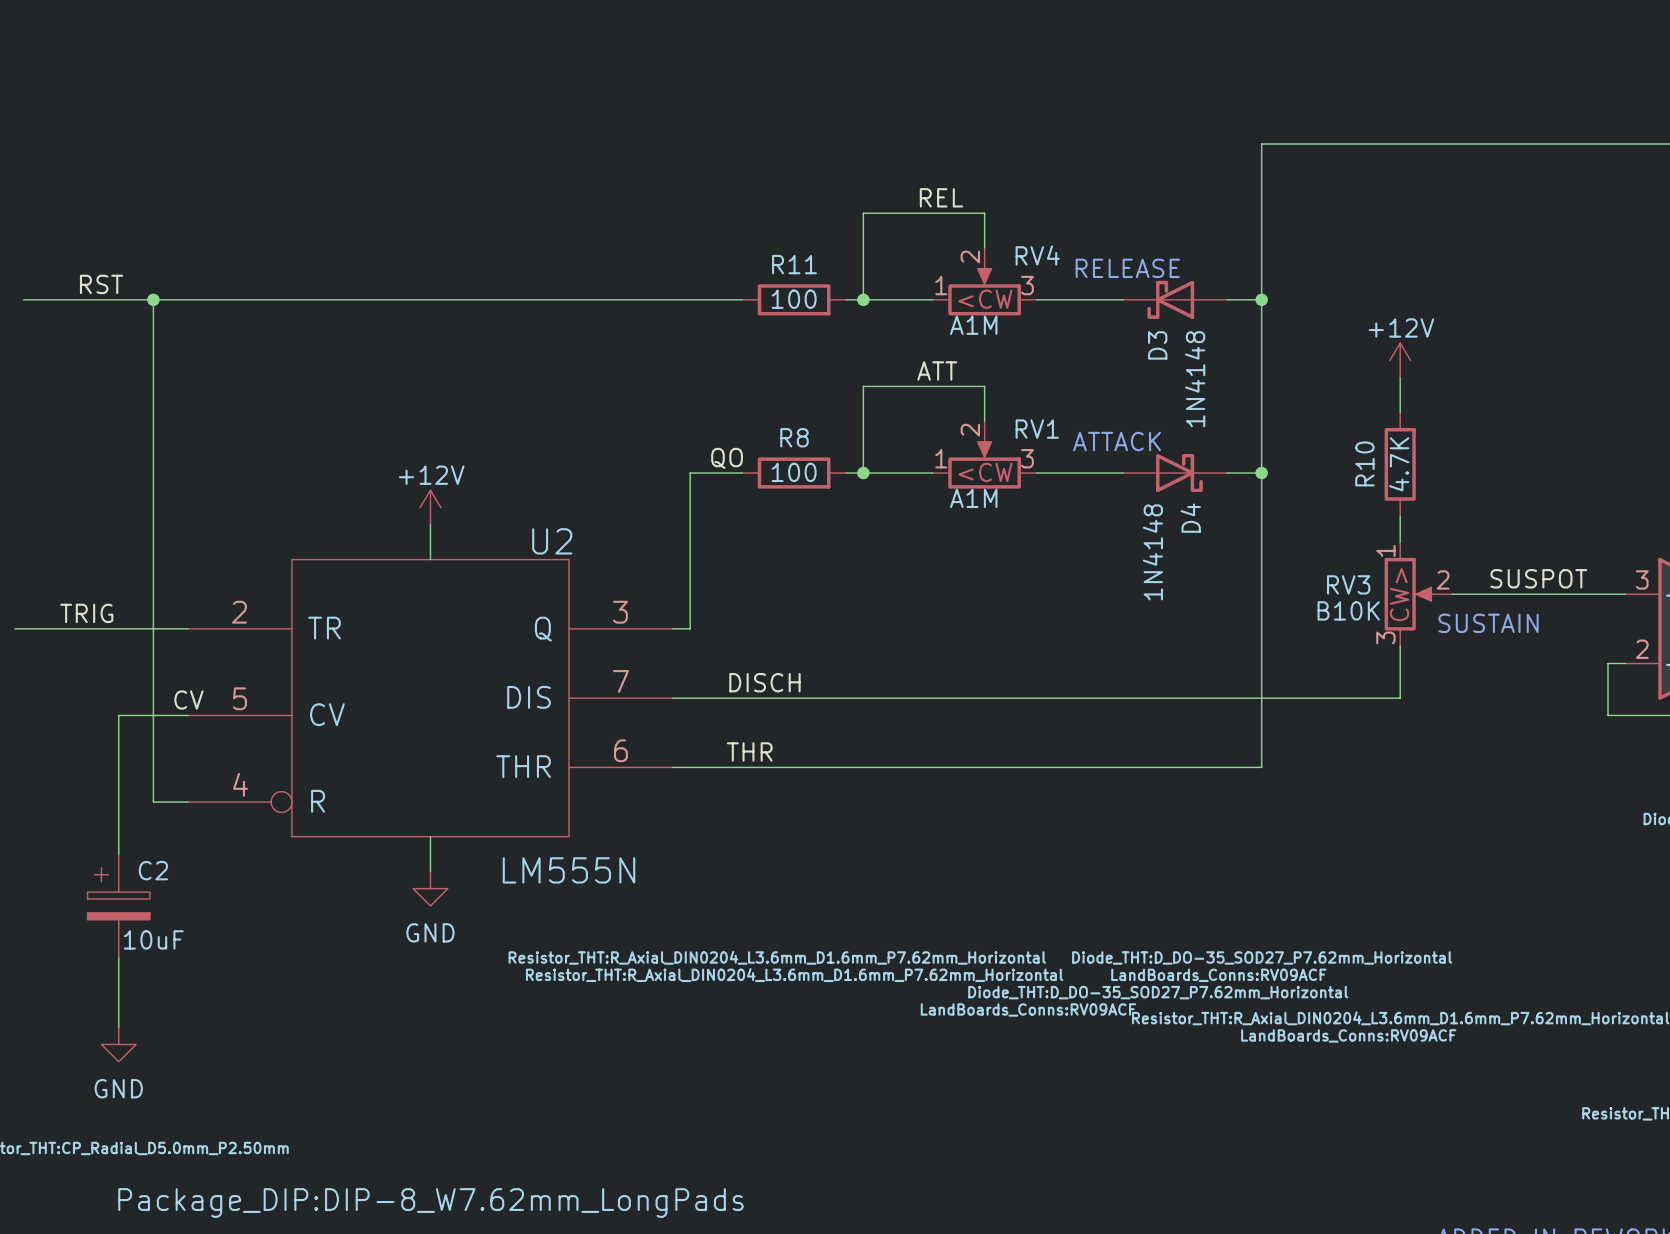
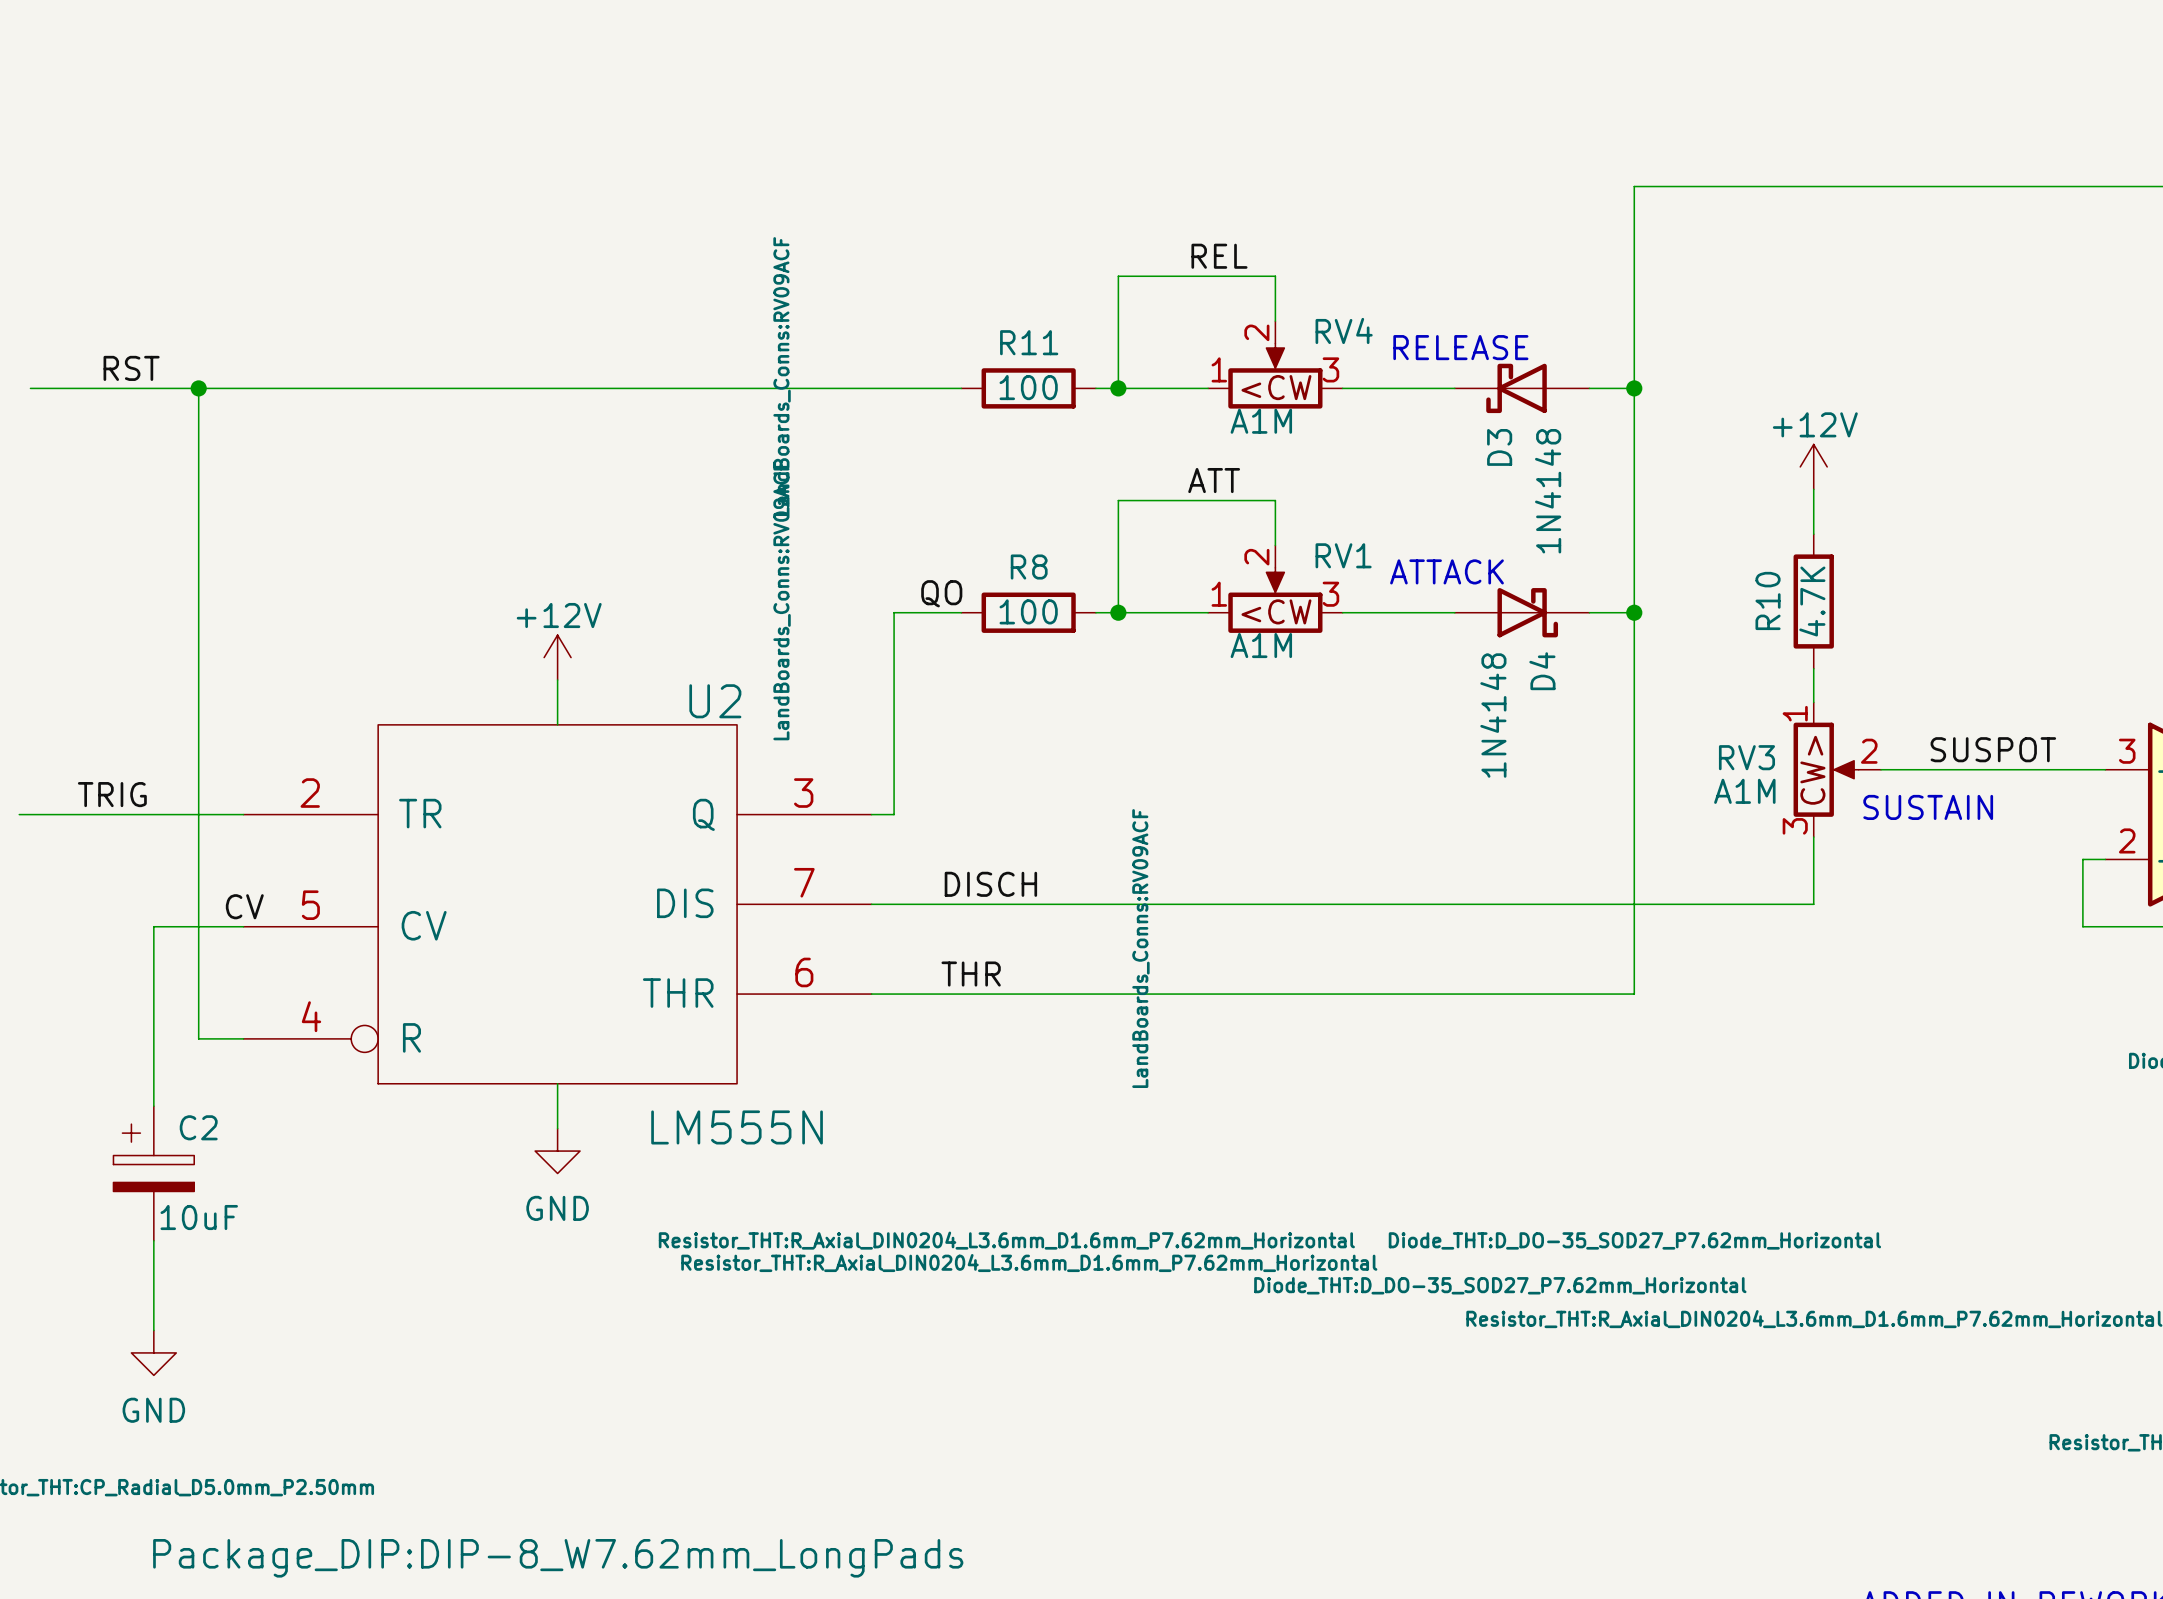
RV3 value: B10K (1348, 610) -> A1M (1744, 791)
RV1 text rotation: 0° (1218, 975) -> 90° counterclockwise (782, 600)
RV1 text position: LandBoards_Conns:RV09ACF (1218, 975) -> LandBoards_Conns:RV09ACF (782, 600)
RV4 text rotation: 0° (1028, 1009) -> 90° counterclockwise (782, 376)
RV4 text position: LandBoards_Conns:RV09ACF (1028, 1009) -> LandBoards_Conns:RV09ACF (782, 376)
RV3 text rotation: 0° (1348, 1035) -> 90° counterclockwise (1140, 948)
RV3 text position: LandBoards_Conns:RV09ACF (1348, 1035) -> LandBoards_Conns:RV09ACF (1140, 948)

